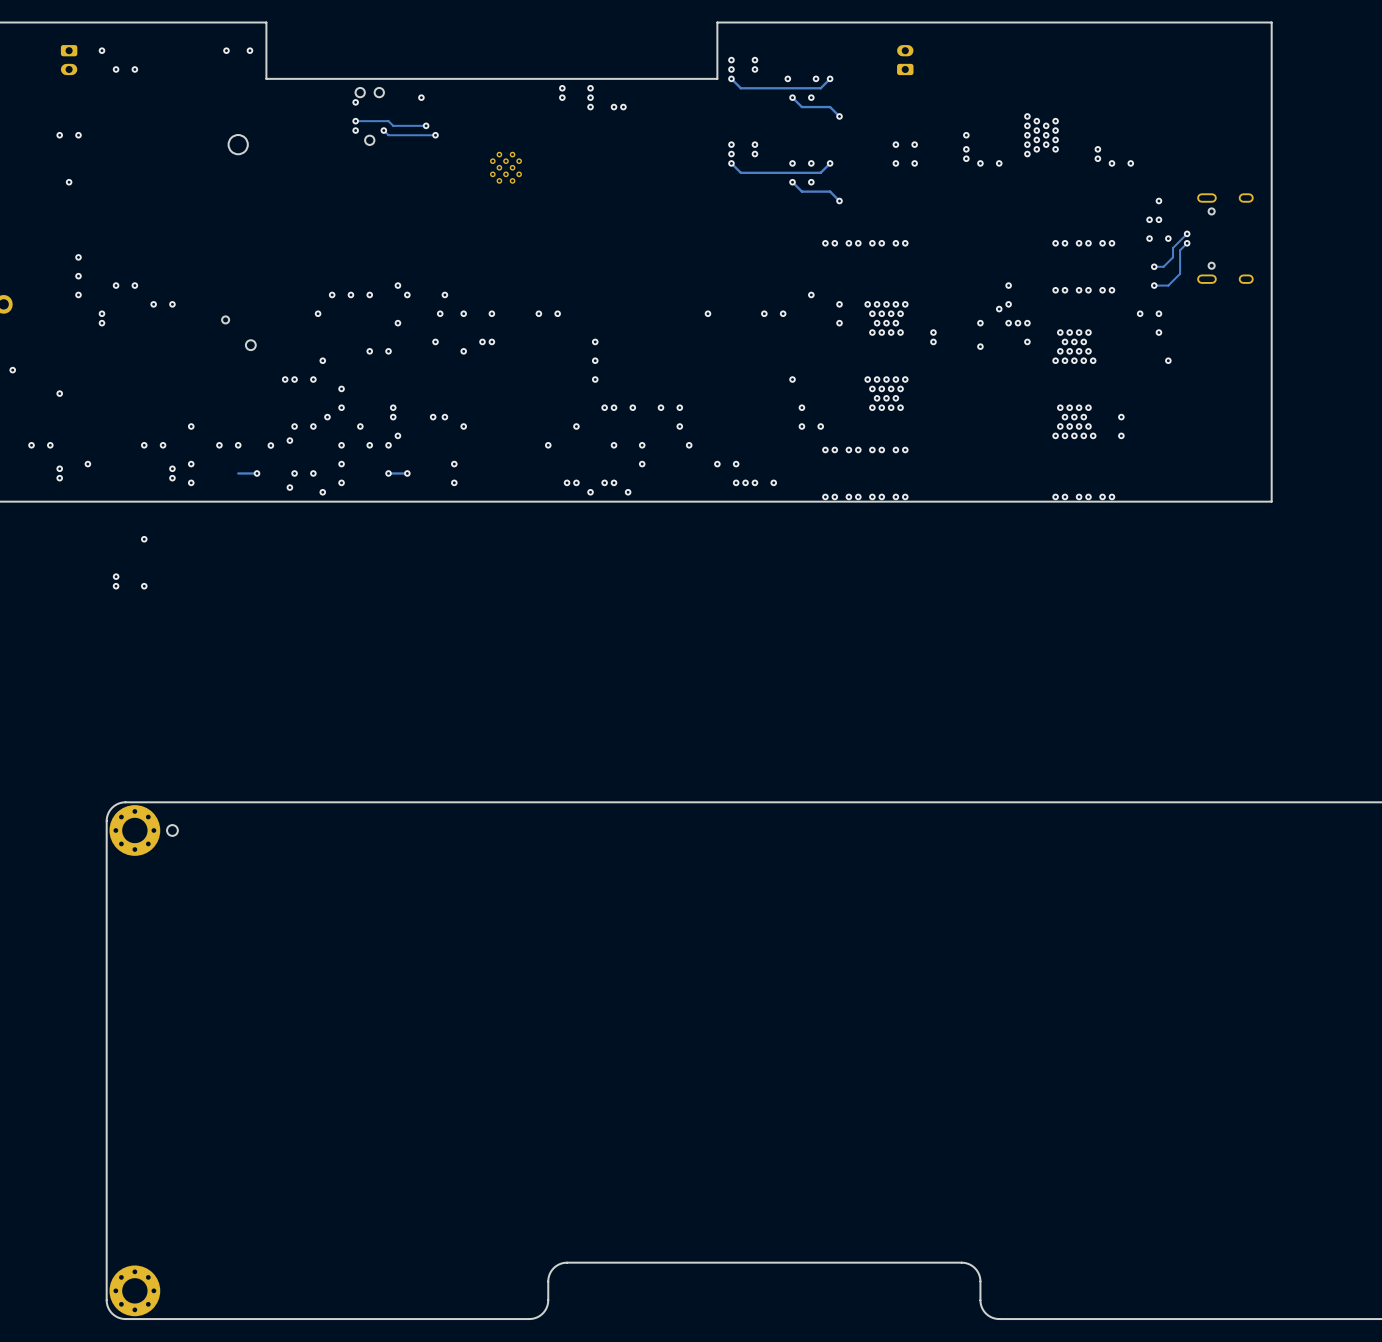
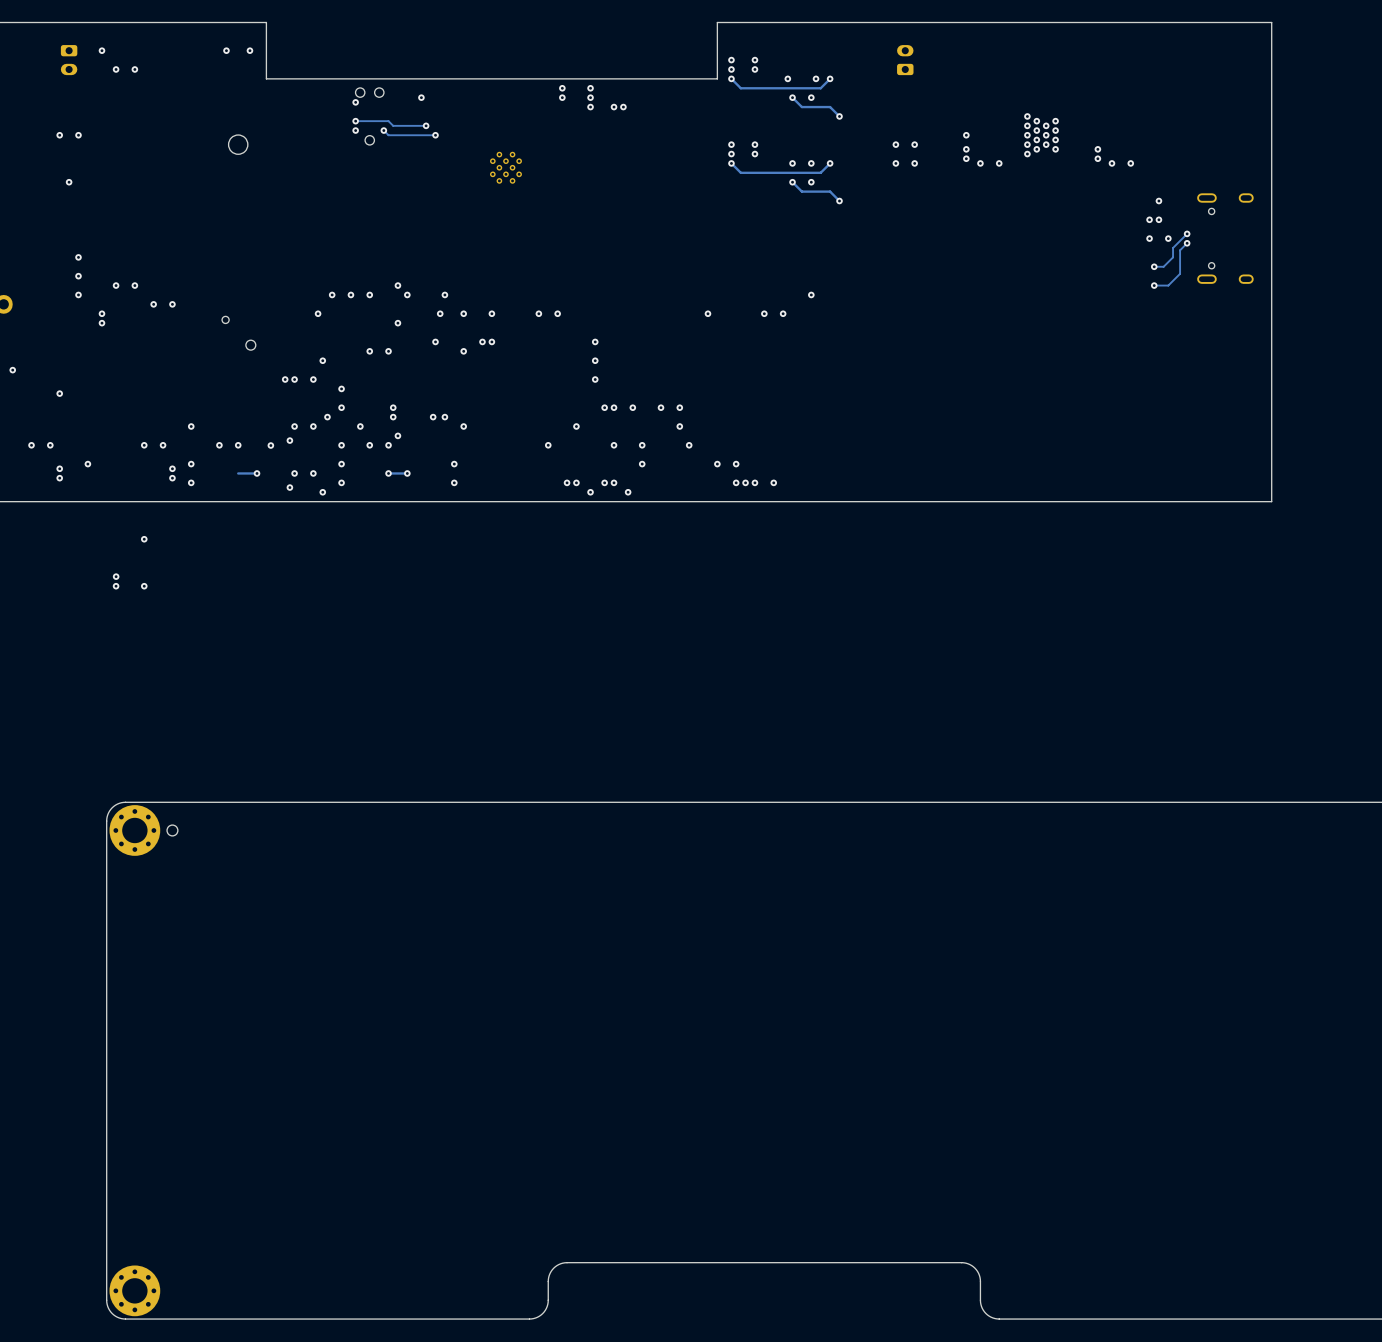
via: (825, 243) -> none
via: (834, 243) -> none
via: (848, 243) -> none
via: (858, 243) -> none
via: (872, 243) -> none
via: (881, 243) -> none
via: (895, 243) -> none
via: (905, 243) -> none
via: (1055, 243) -> none
via: (1064, 243) -> none
via: (1079, 243) -> none
via: (1088, 243) -> none
via: (1102, 243) -> none
via: (1111, 243) -> none
via: (1008, 285) -> none
via: (1055, 290) -> none
via: (1064, 290) -> none
via: (1079, 290) -> none
via: (1088, 290) -> none
via: (1102, 290) -> none
via: (1111, 290) -> none
via: (839, 304) -> none
via: (867, 304) -> none
via: (877, 304) -> none
via: (886, 304) -> none
via: (895, 304) -> none
via: (905, 304) -> none
via: (1008, 304) -> none
via: (999, 309) -> none
via: (872, 313) -> none
via: (881, 313) -> none
via: (891, 313) -> none
via: (900, 313) -> none
via: (1140, 313) -> none
via: (1158, 313) -> none
via: (839, 323) -> none
via: (877, 323) -> none
via: (886, 323) -> none
via: (895, 323) -> none
via: (980, 323) -> none
via: (1008, 323) -> none
via: (1018, 323) -> none
via: (1027, 323) -> none
via: (872, 332) -> none
via: (881, 332) -> none
via: (891, 332) -> none
via: (900, 332) -> none
via: (933, 332) -> none
via: (1060, 332) -> none
via: (1069, 332) -> none
via: (1079, 332) -> none
via: (1088, 332) -> none
via: (1158, 332) -> none
via: (933, 341) -> none
via: (1027, 341) -> none
via: (1064, 341) -> none
via: (1074, 341) -> none
via: (1083, 341) -> none
via: (980, 346) -> none
via: (1060, 351) -> none
via: (1069, 351) -> none
via: (1079, 351) -> none
via: (1088, 351) -> none
via: (1055, 360) -> none
via: (1064, 360) -> none
via: (1074, 360) -> none
via: (1083, 360) -> none
via: (1093, 360) -> none
via: (1168, 360) -> none
via: (792, 379) -> none
via: (867, 379) -> none
via: (877, 379) -> none
via: (886, 379) -> none
via: (895, 379) -> none
via: (905, 379) -> none
via: (872, 388) -> none
via: (881, 388) -> none
via: (891, 388) -> none
via: (900, 388) -> none
via: (877, 398) -> none
via: (886, 398) -> none
via: (895, 398) -> none
via: (801, 407) -> none
via: (872, 407) -> none
via: (881, 407) -> none
via: (891, 407) -> none
via: (900, 407) -> none
via: (1060, 407) -> none
via: (1069, 407) -> none
via: (1079, 407) -> none
via: (1088, 407) -> none
via: (1064, 417) -> none
via: (1074, 417) -> none
via: (1083, 417) -> none
via: (1121, 417) -> none
via: (801, 426) -> none
via: (820, 426) -> none
via: (1060, 426) -> none
via: (1069, 426) -> none
via: (1079, 426) -> none
via: (1088, 426) -> none
via: (1055, 435) -> none
via: (1064, 435) -> none
via: (1074, 435) -> none
via: (1083, 435) -> none
via: (1093, 435) -> none
via: (1121, 435) -> none
via: (825, 449) -> none
via: (834, 449) -> none
via: (848, 449) -> none
via: (858, 449) -> none
via: (872, 449) -> none
via: (881, 449) -> none
via: (895, 449) -> none
via: (905, 449) -> none
via: (825, 496) -> none
via: (834, 496) -> none
via: (848, 496) -> none
via: (858, 496) -> none
via: (872, 496) -> none
via: (881, 496) -> none
via: (895, 496) -> none
via: (905, 496) -> none
via: (1055, 496) -> none
via: (1064, 496) -> none
via: (1079, 496) -> none
via: (1088, 496) -> none
via: (1102, 496) -> none
via: (1111, 496) -> none

